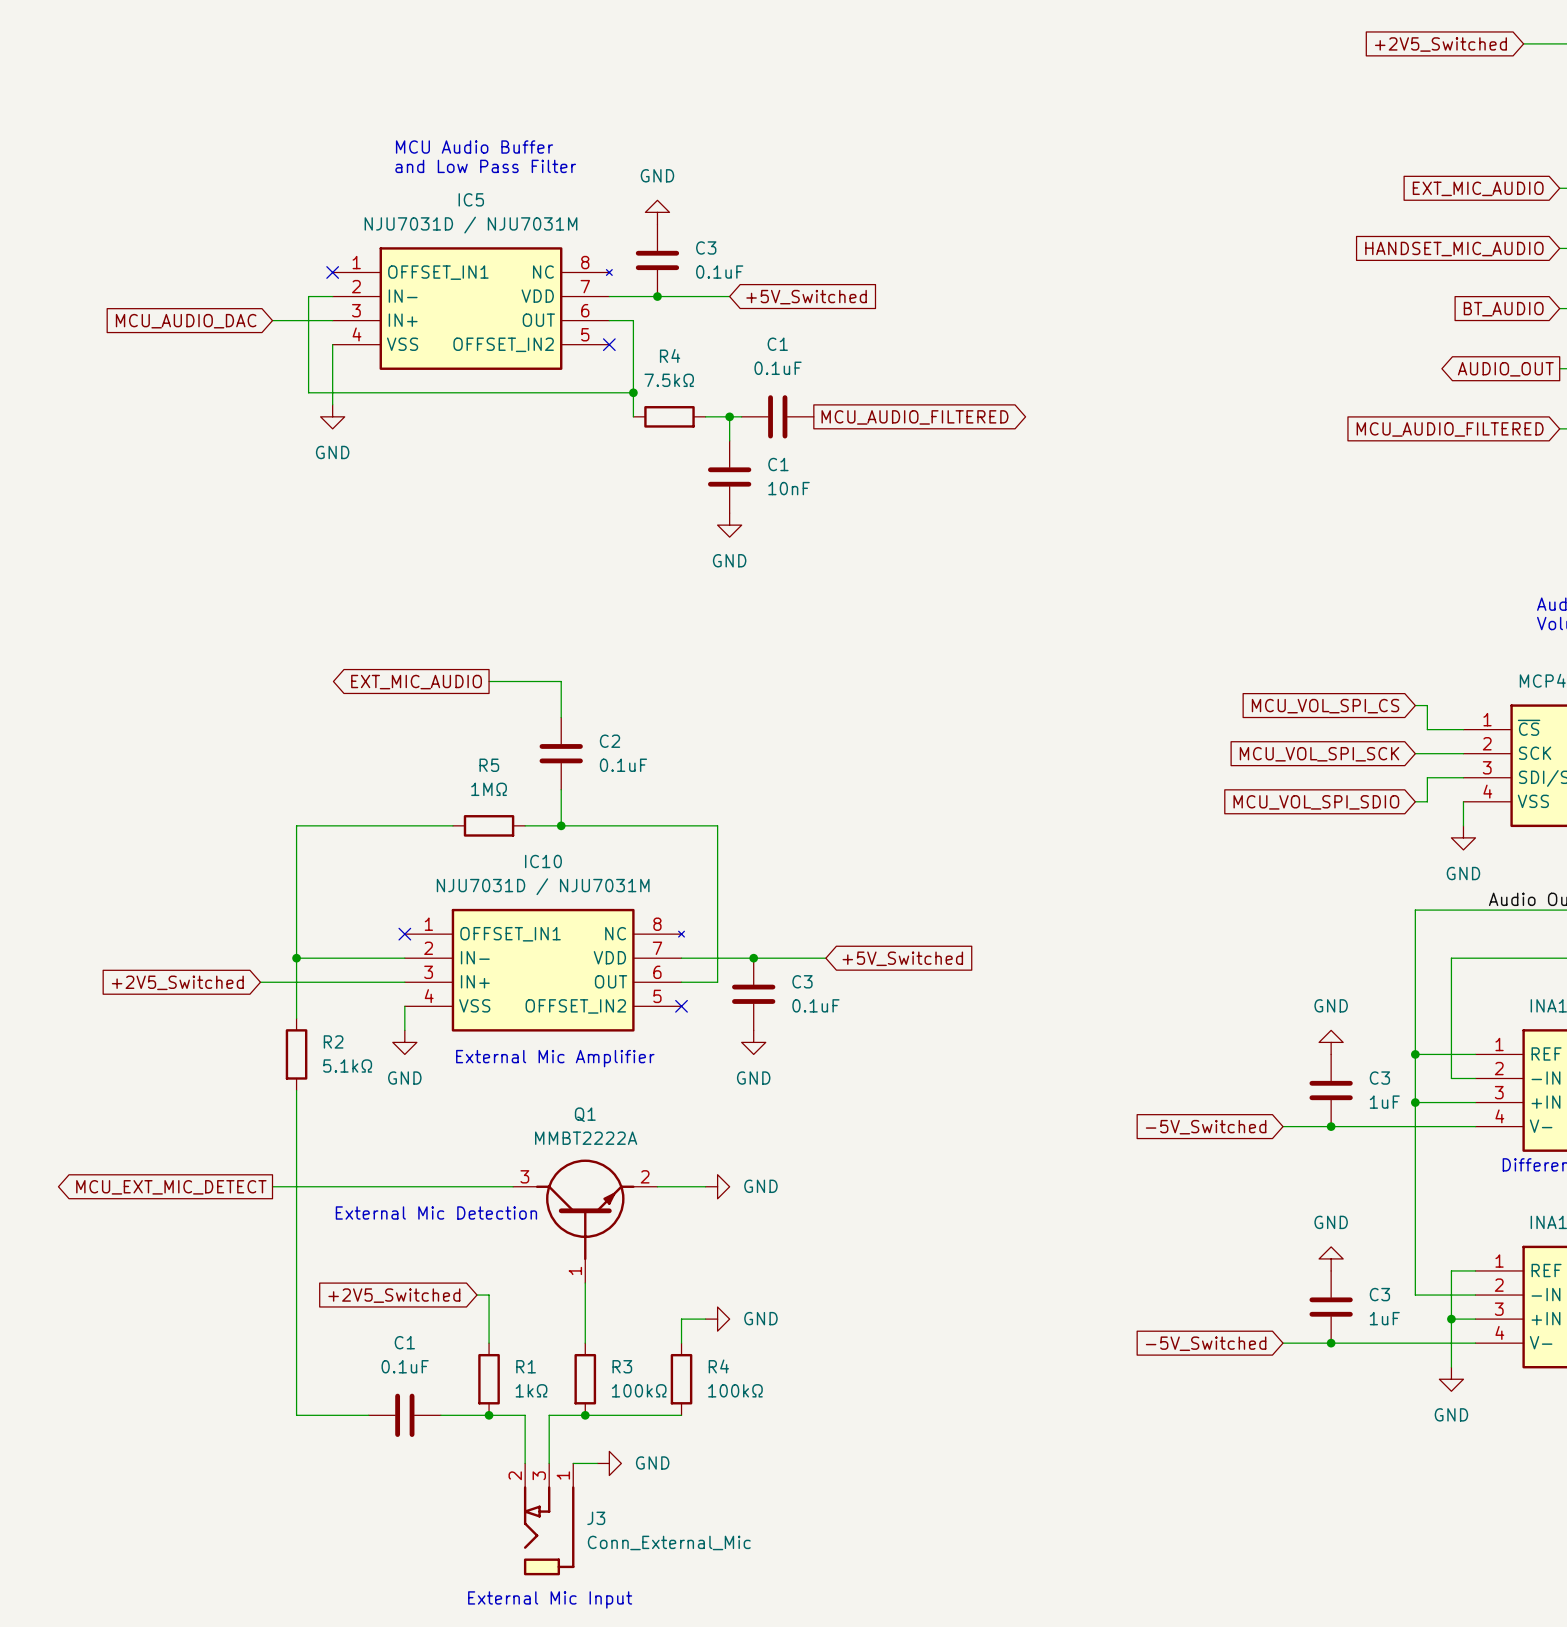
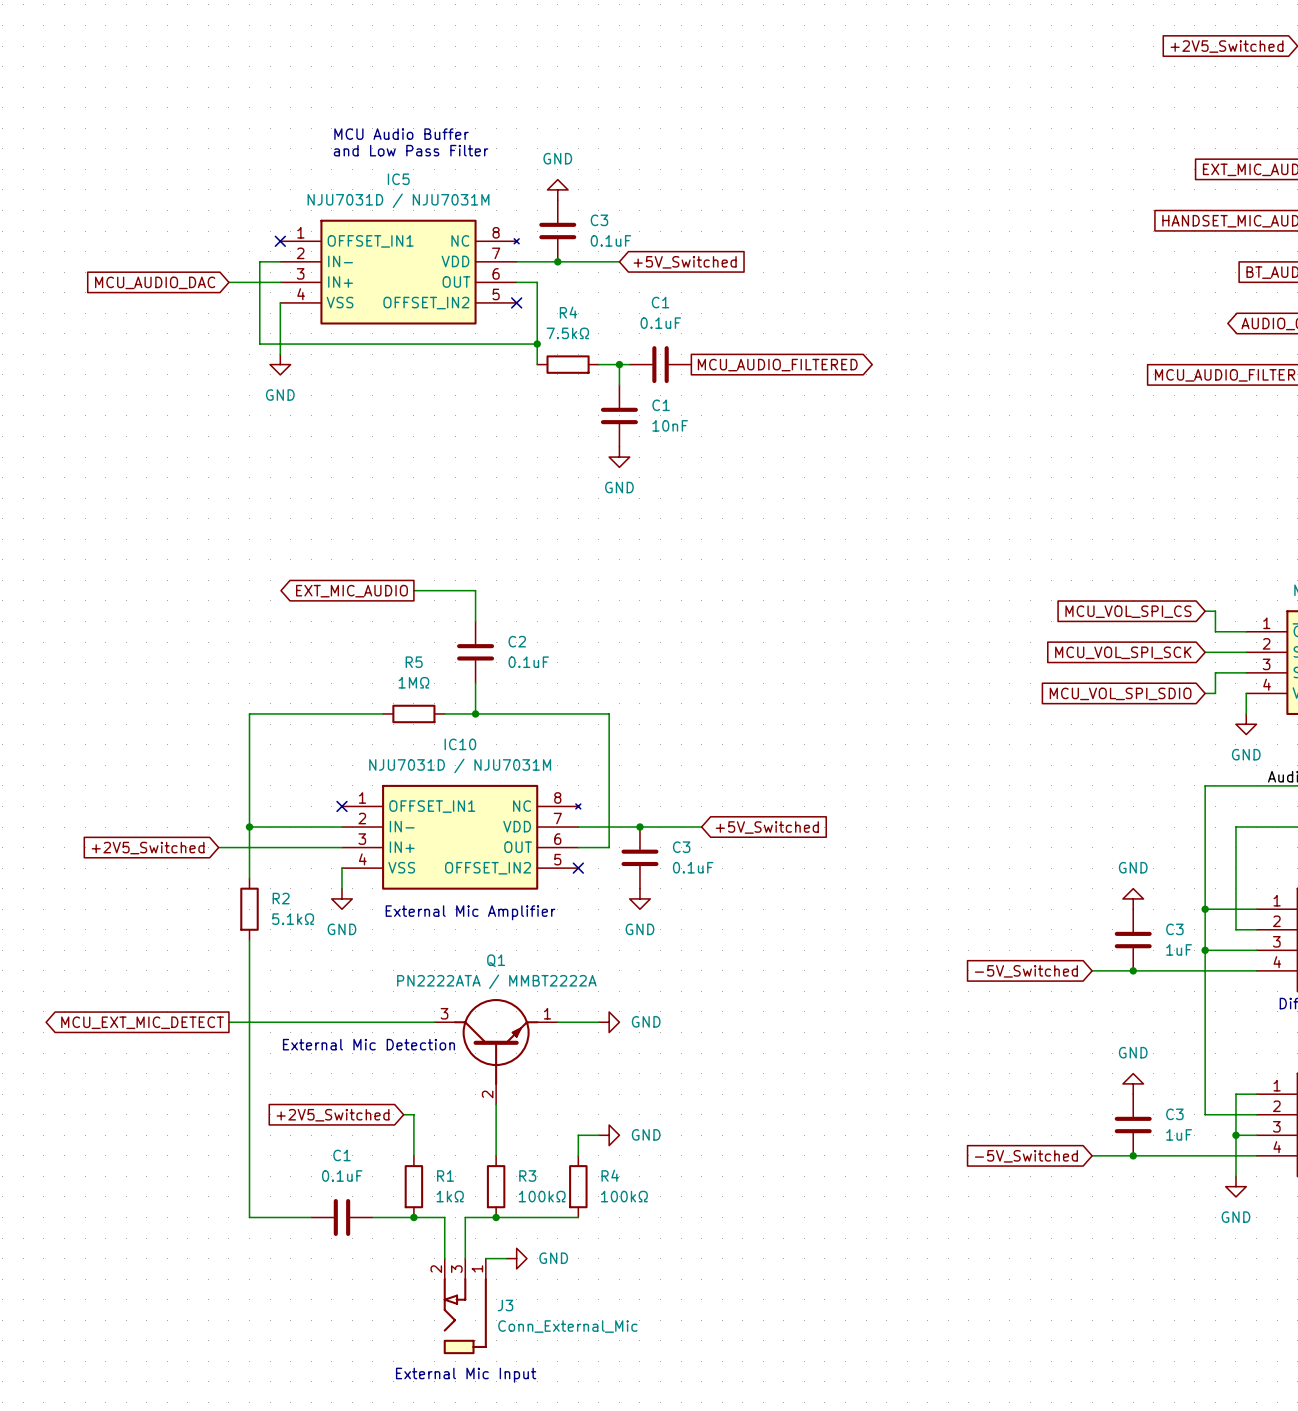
Q1 value: MMBT2222A (586, 1138) -> PN2222ATA / MMBT2222A (496, 981)
Q1 pin number: 2 (645, 1176) -> 1 (547, 1013)
Q1 pin number: 1 (575, 1270) -> 2 (487, 1094)

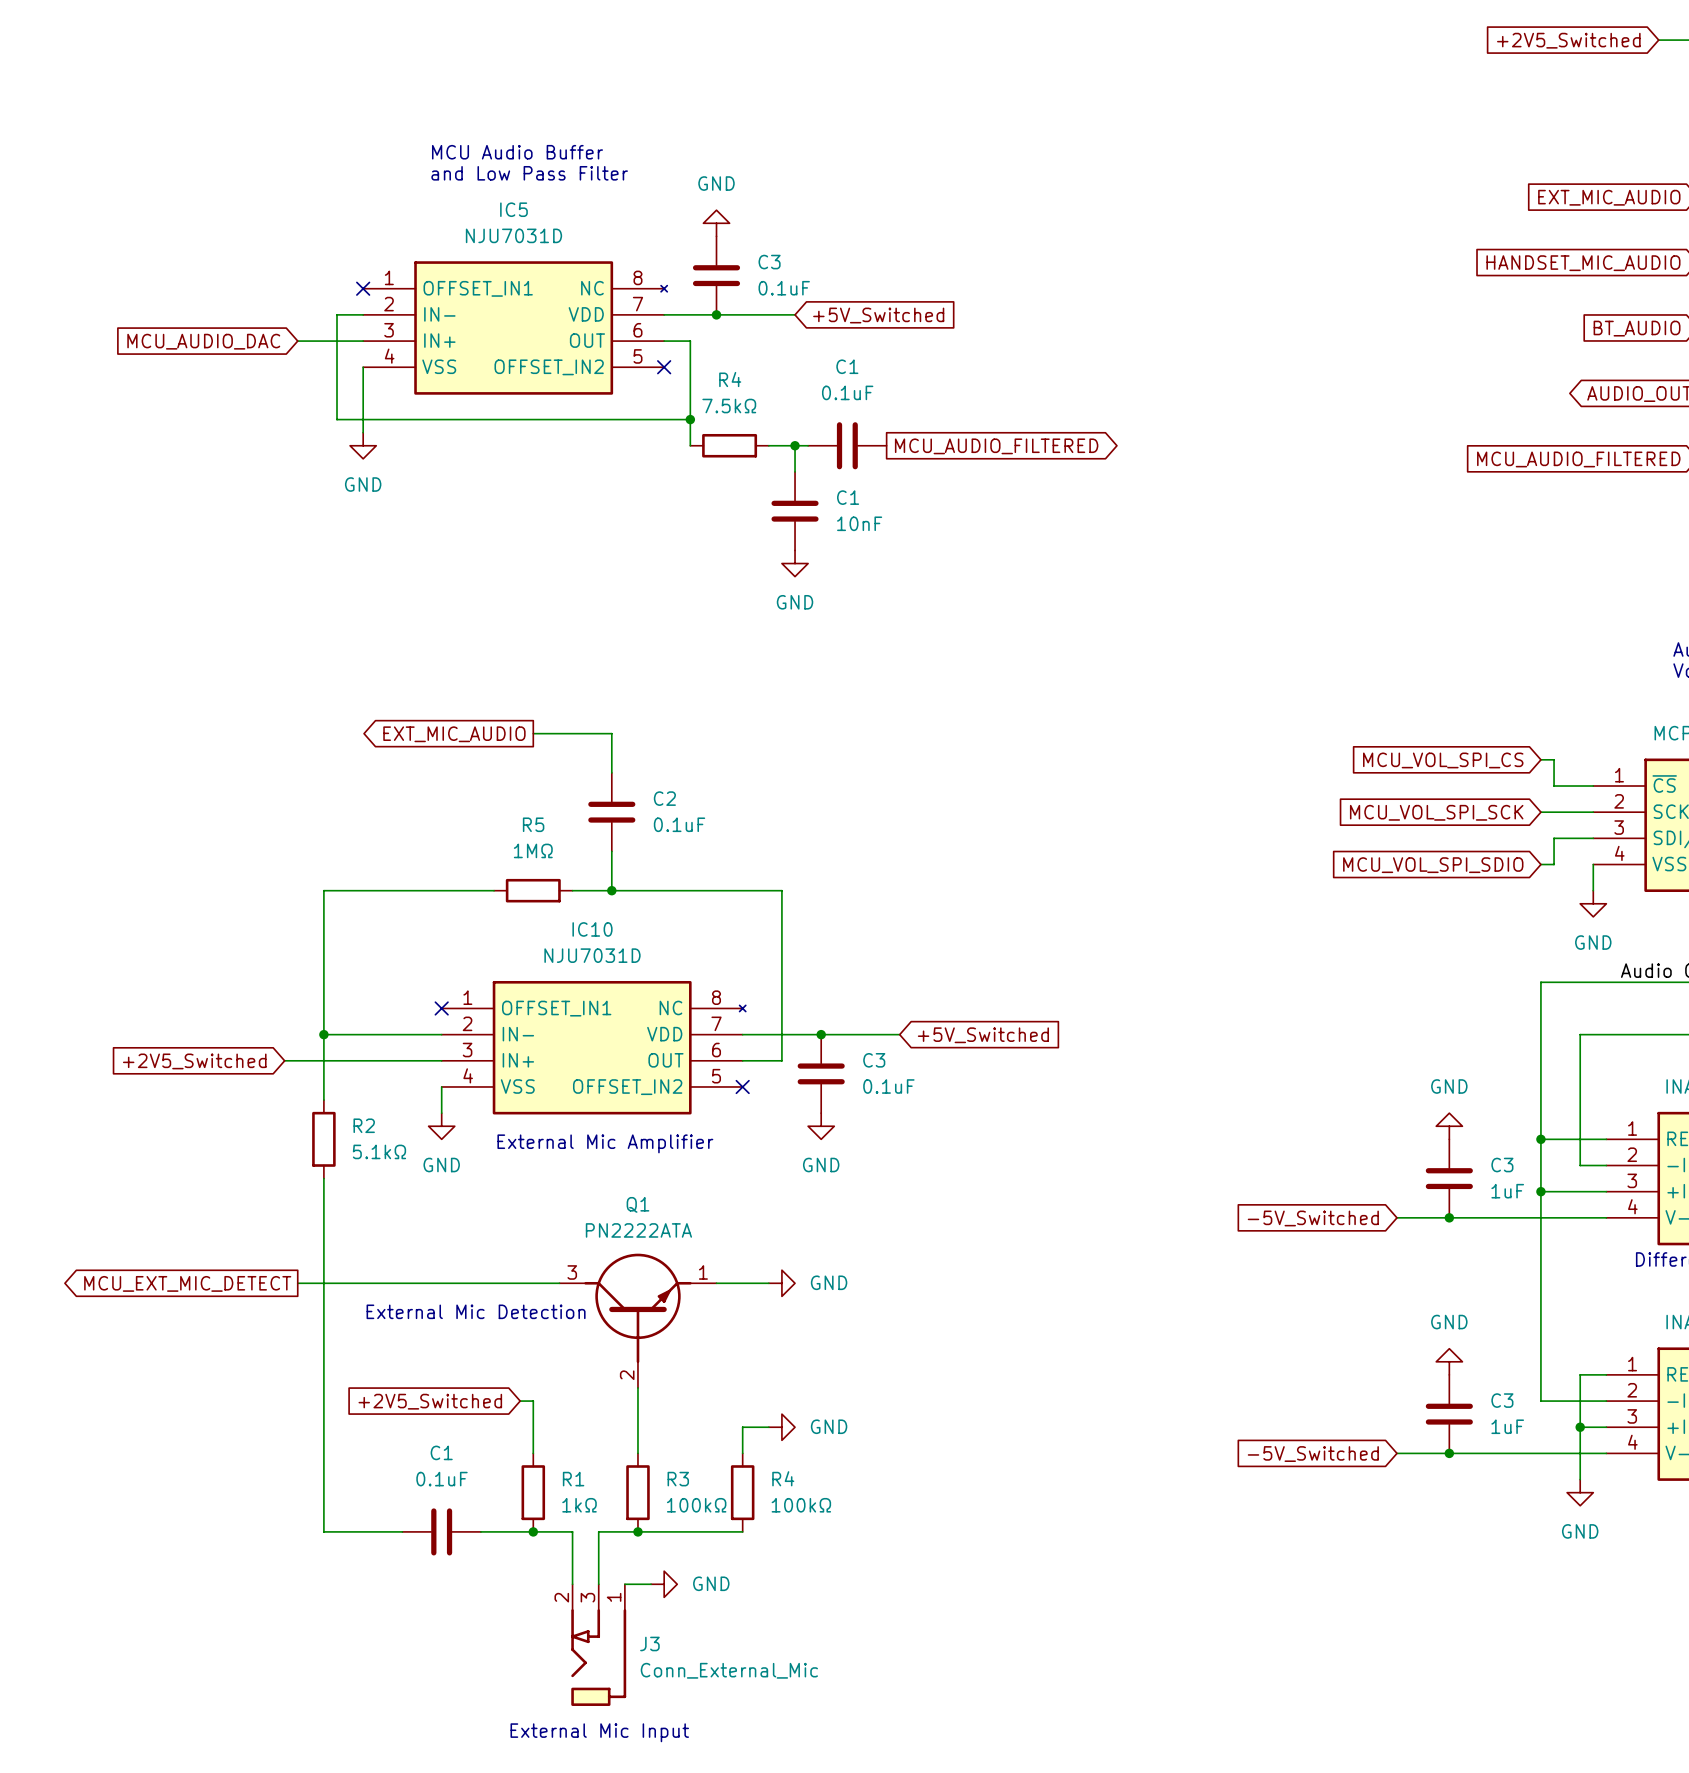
IC5 value: NJU7031D / NJU7031M (398, 200) -> NJU7031D (513, 235)
IC10 value: NJU7031D / NJU7031M (460, 765) -> NJU7031D (592, 955)
Q1 value: PN2222ATA / MMBT2222A (496, 981) -> PN2222ATA (638, 1230)

